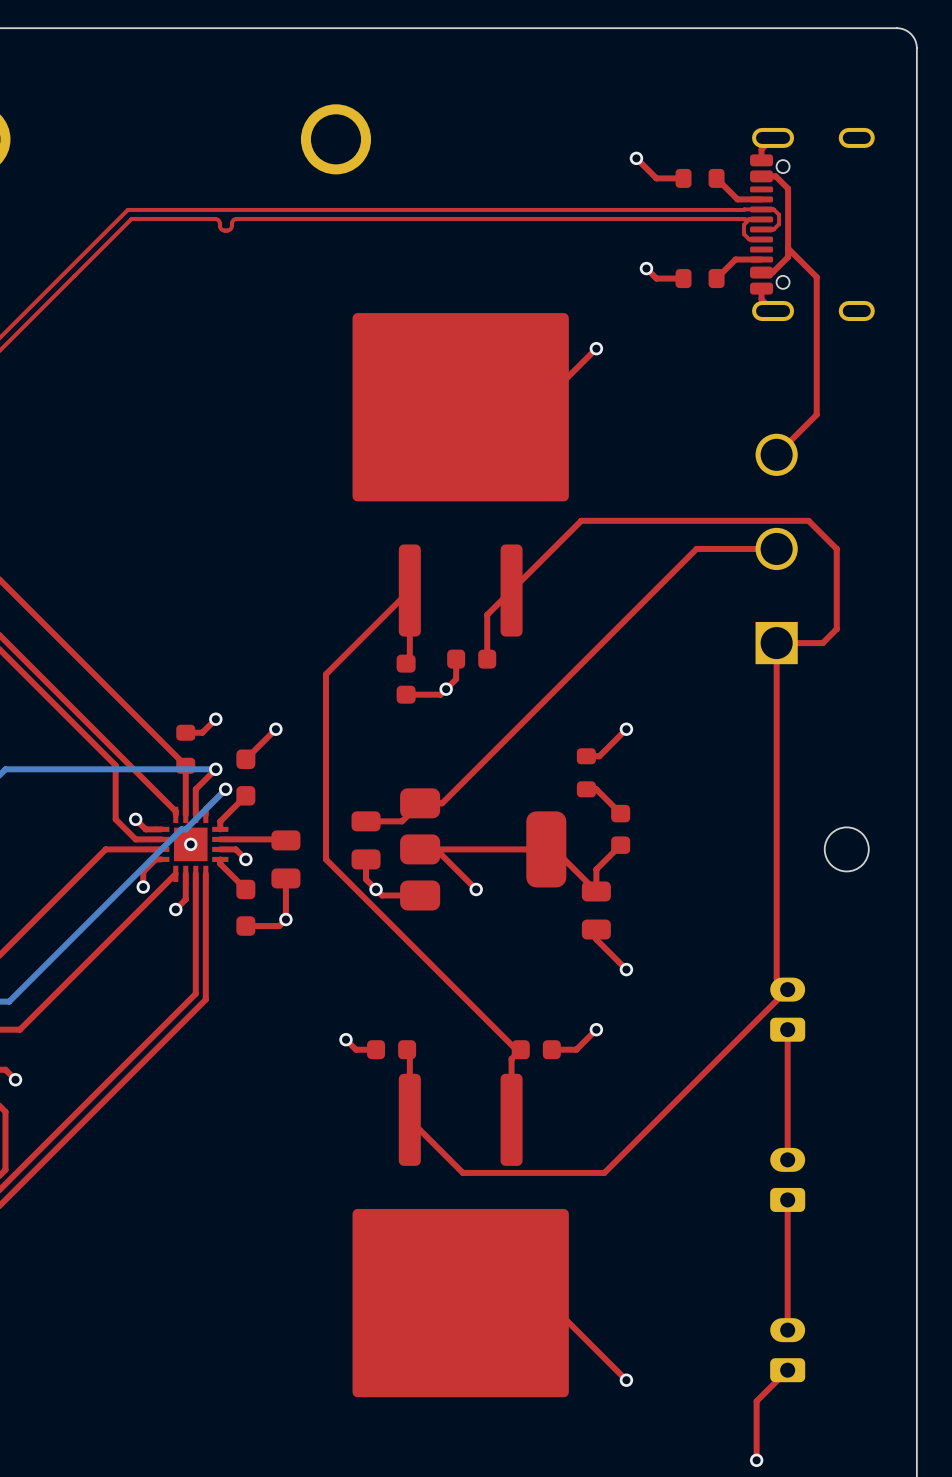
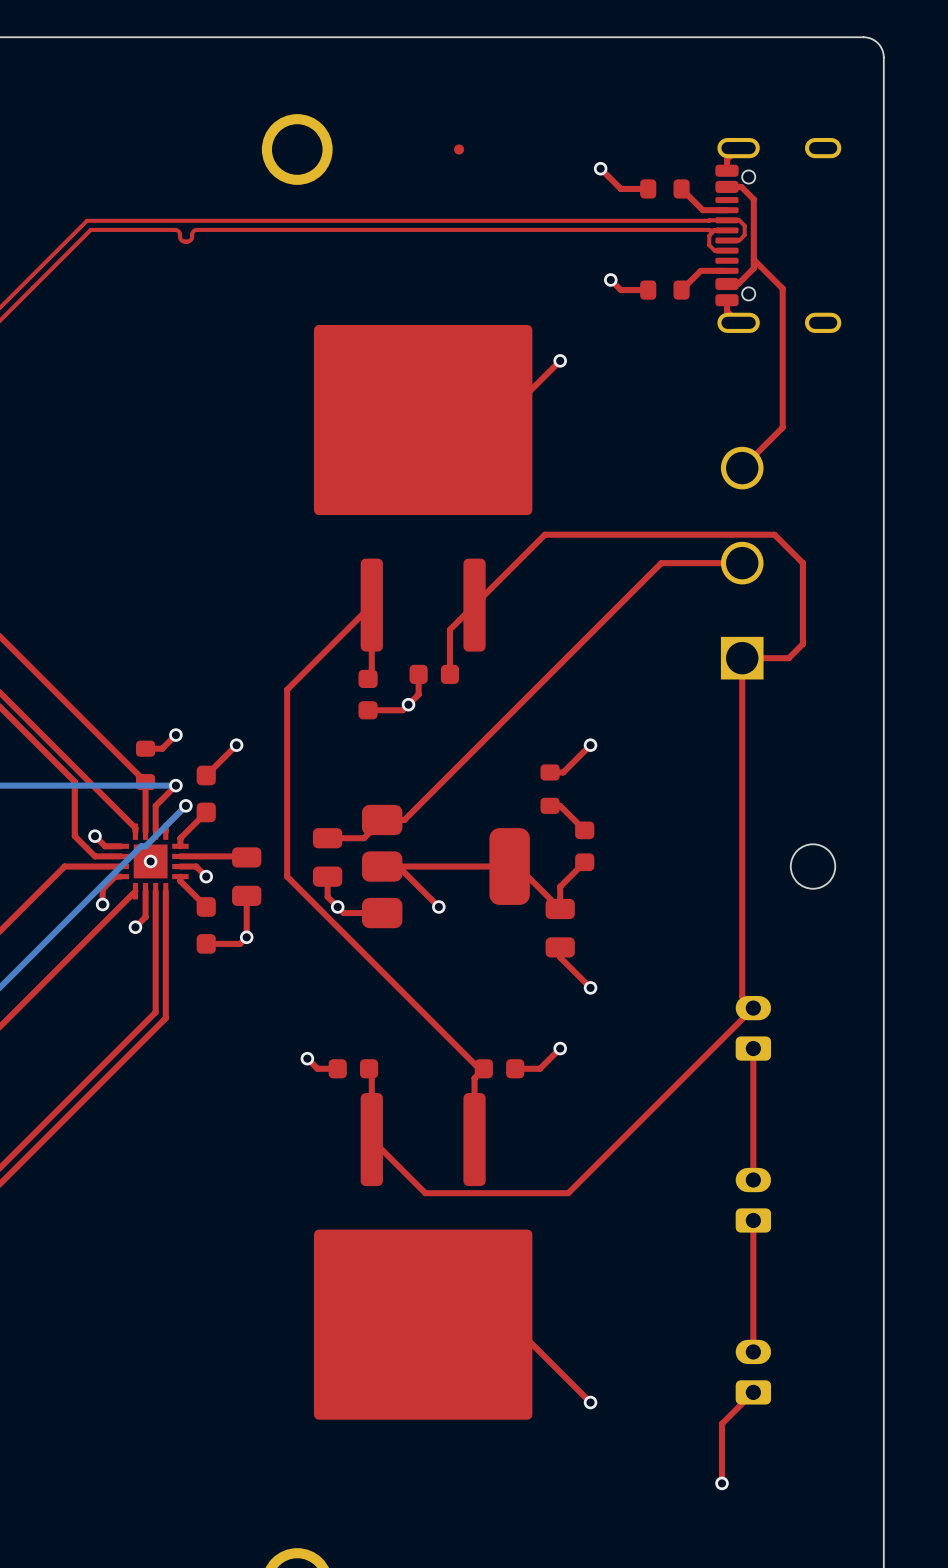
part: none -> (459, 149)

